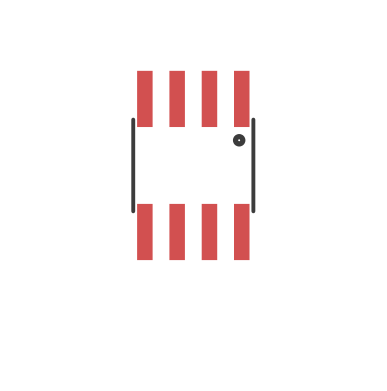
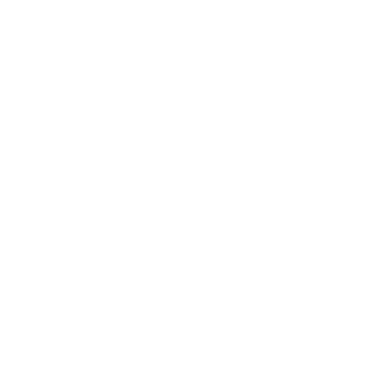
part: (193, 165) -> none

